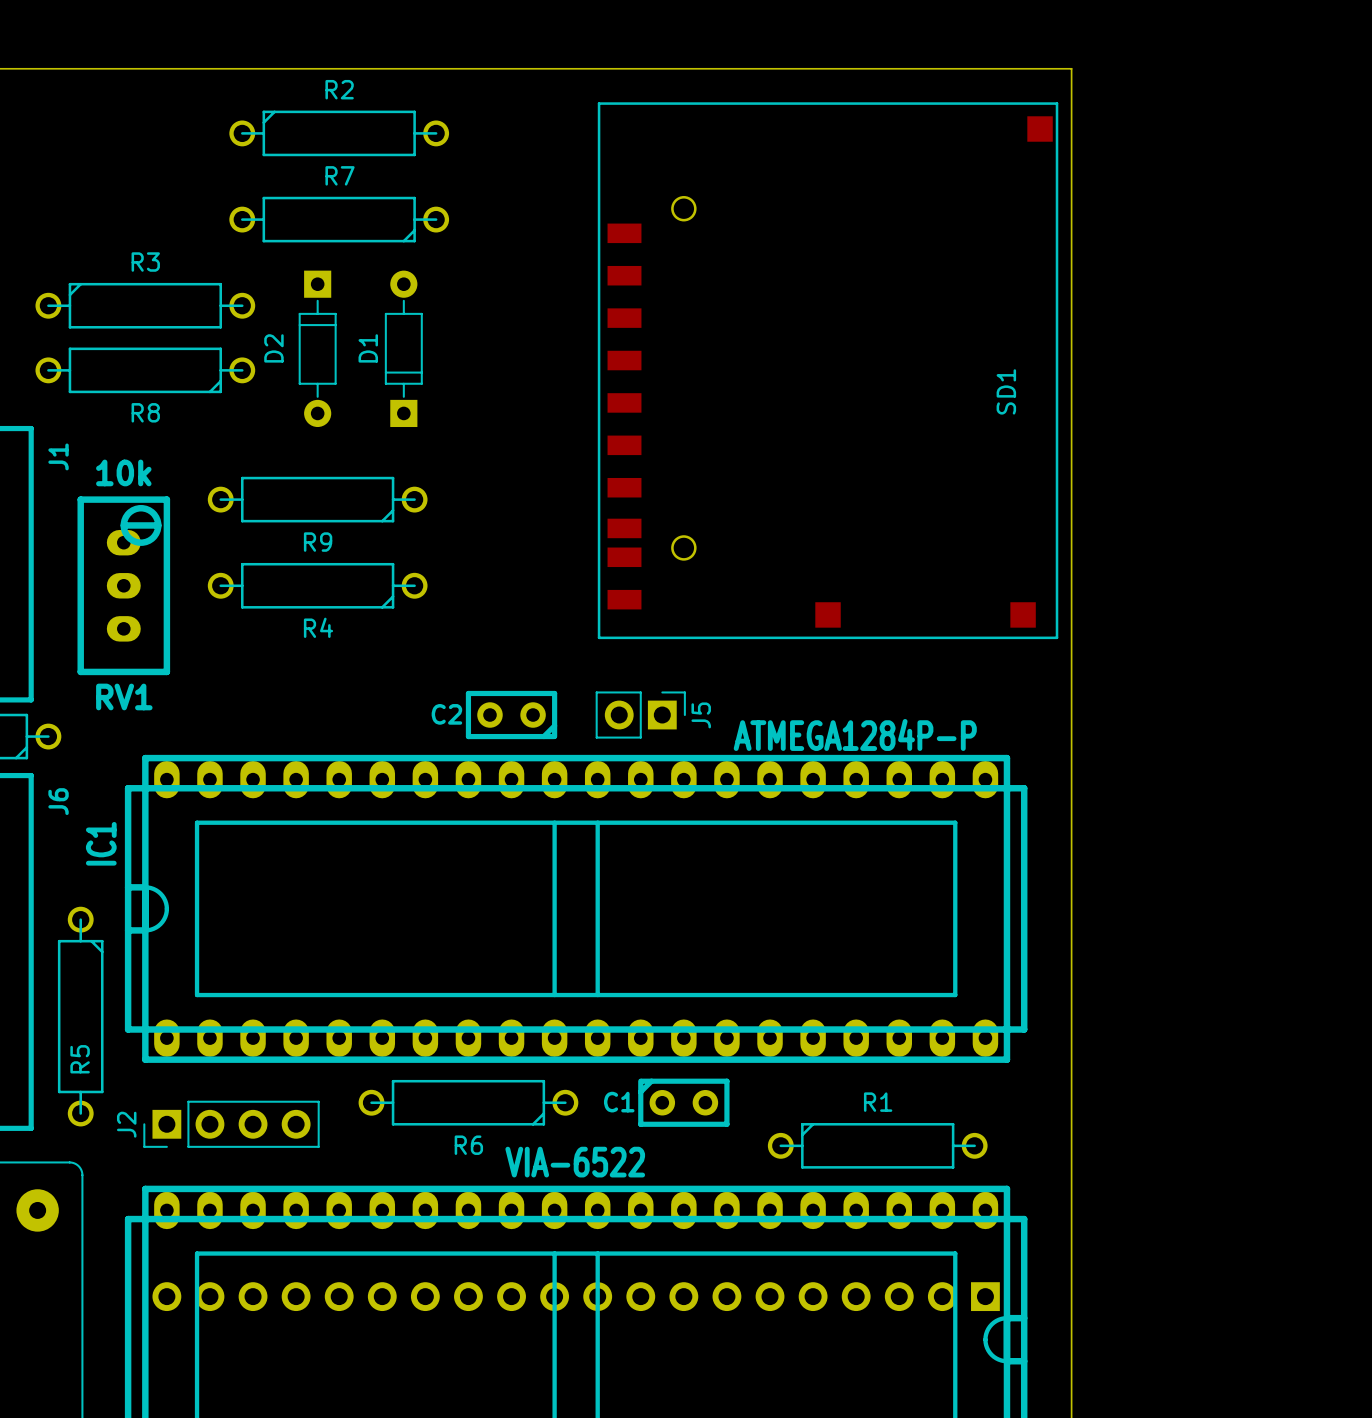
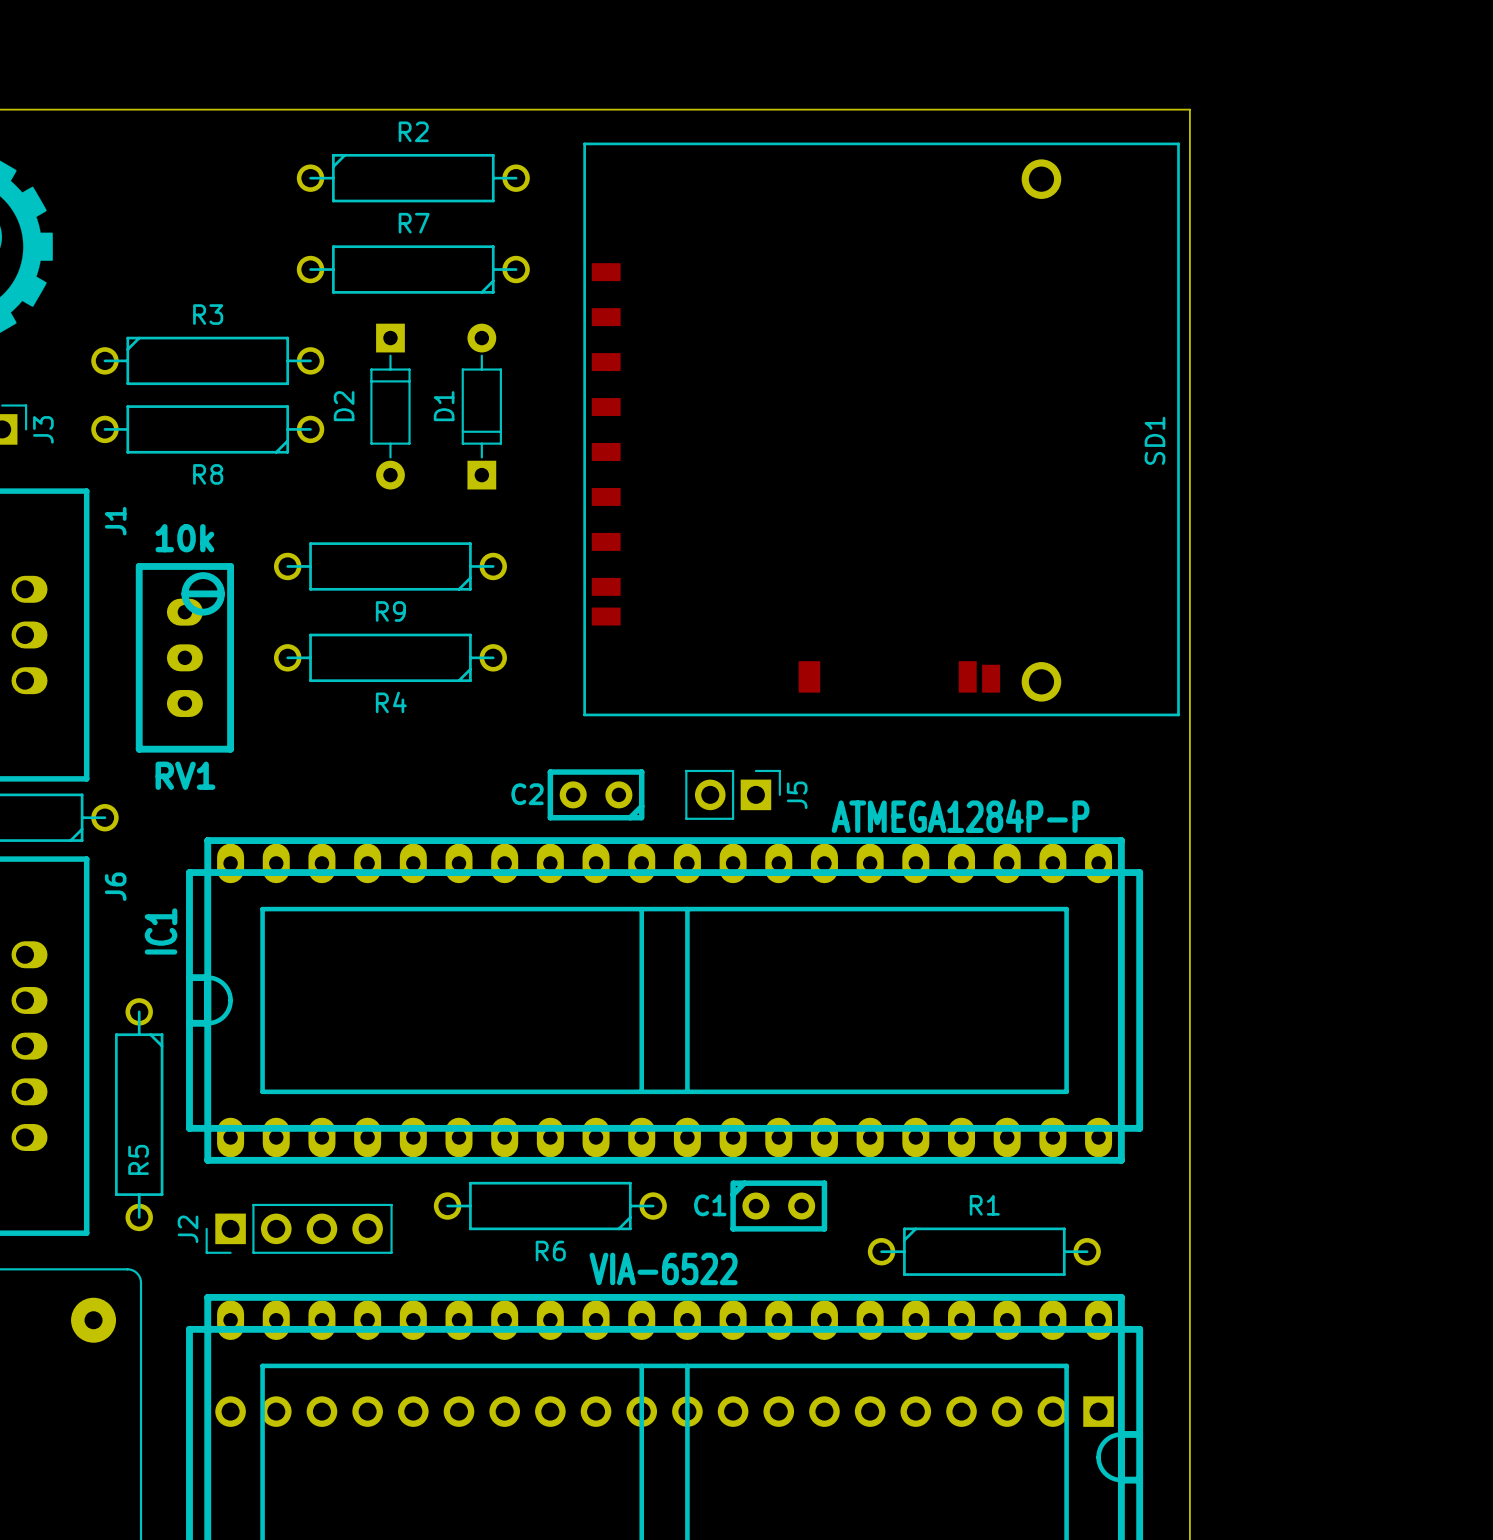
SD1 footprint: [597, 102, 1059, 640] -> [583, 142, 1180, 717]
SD1 name position: SD1 (1006, 391) -> SD1 (1154, 440)

